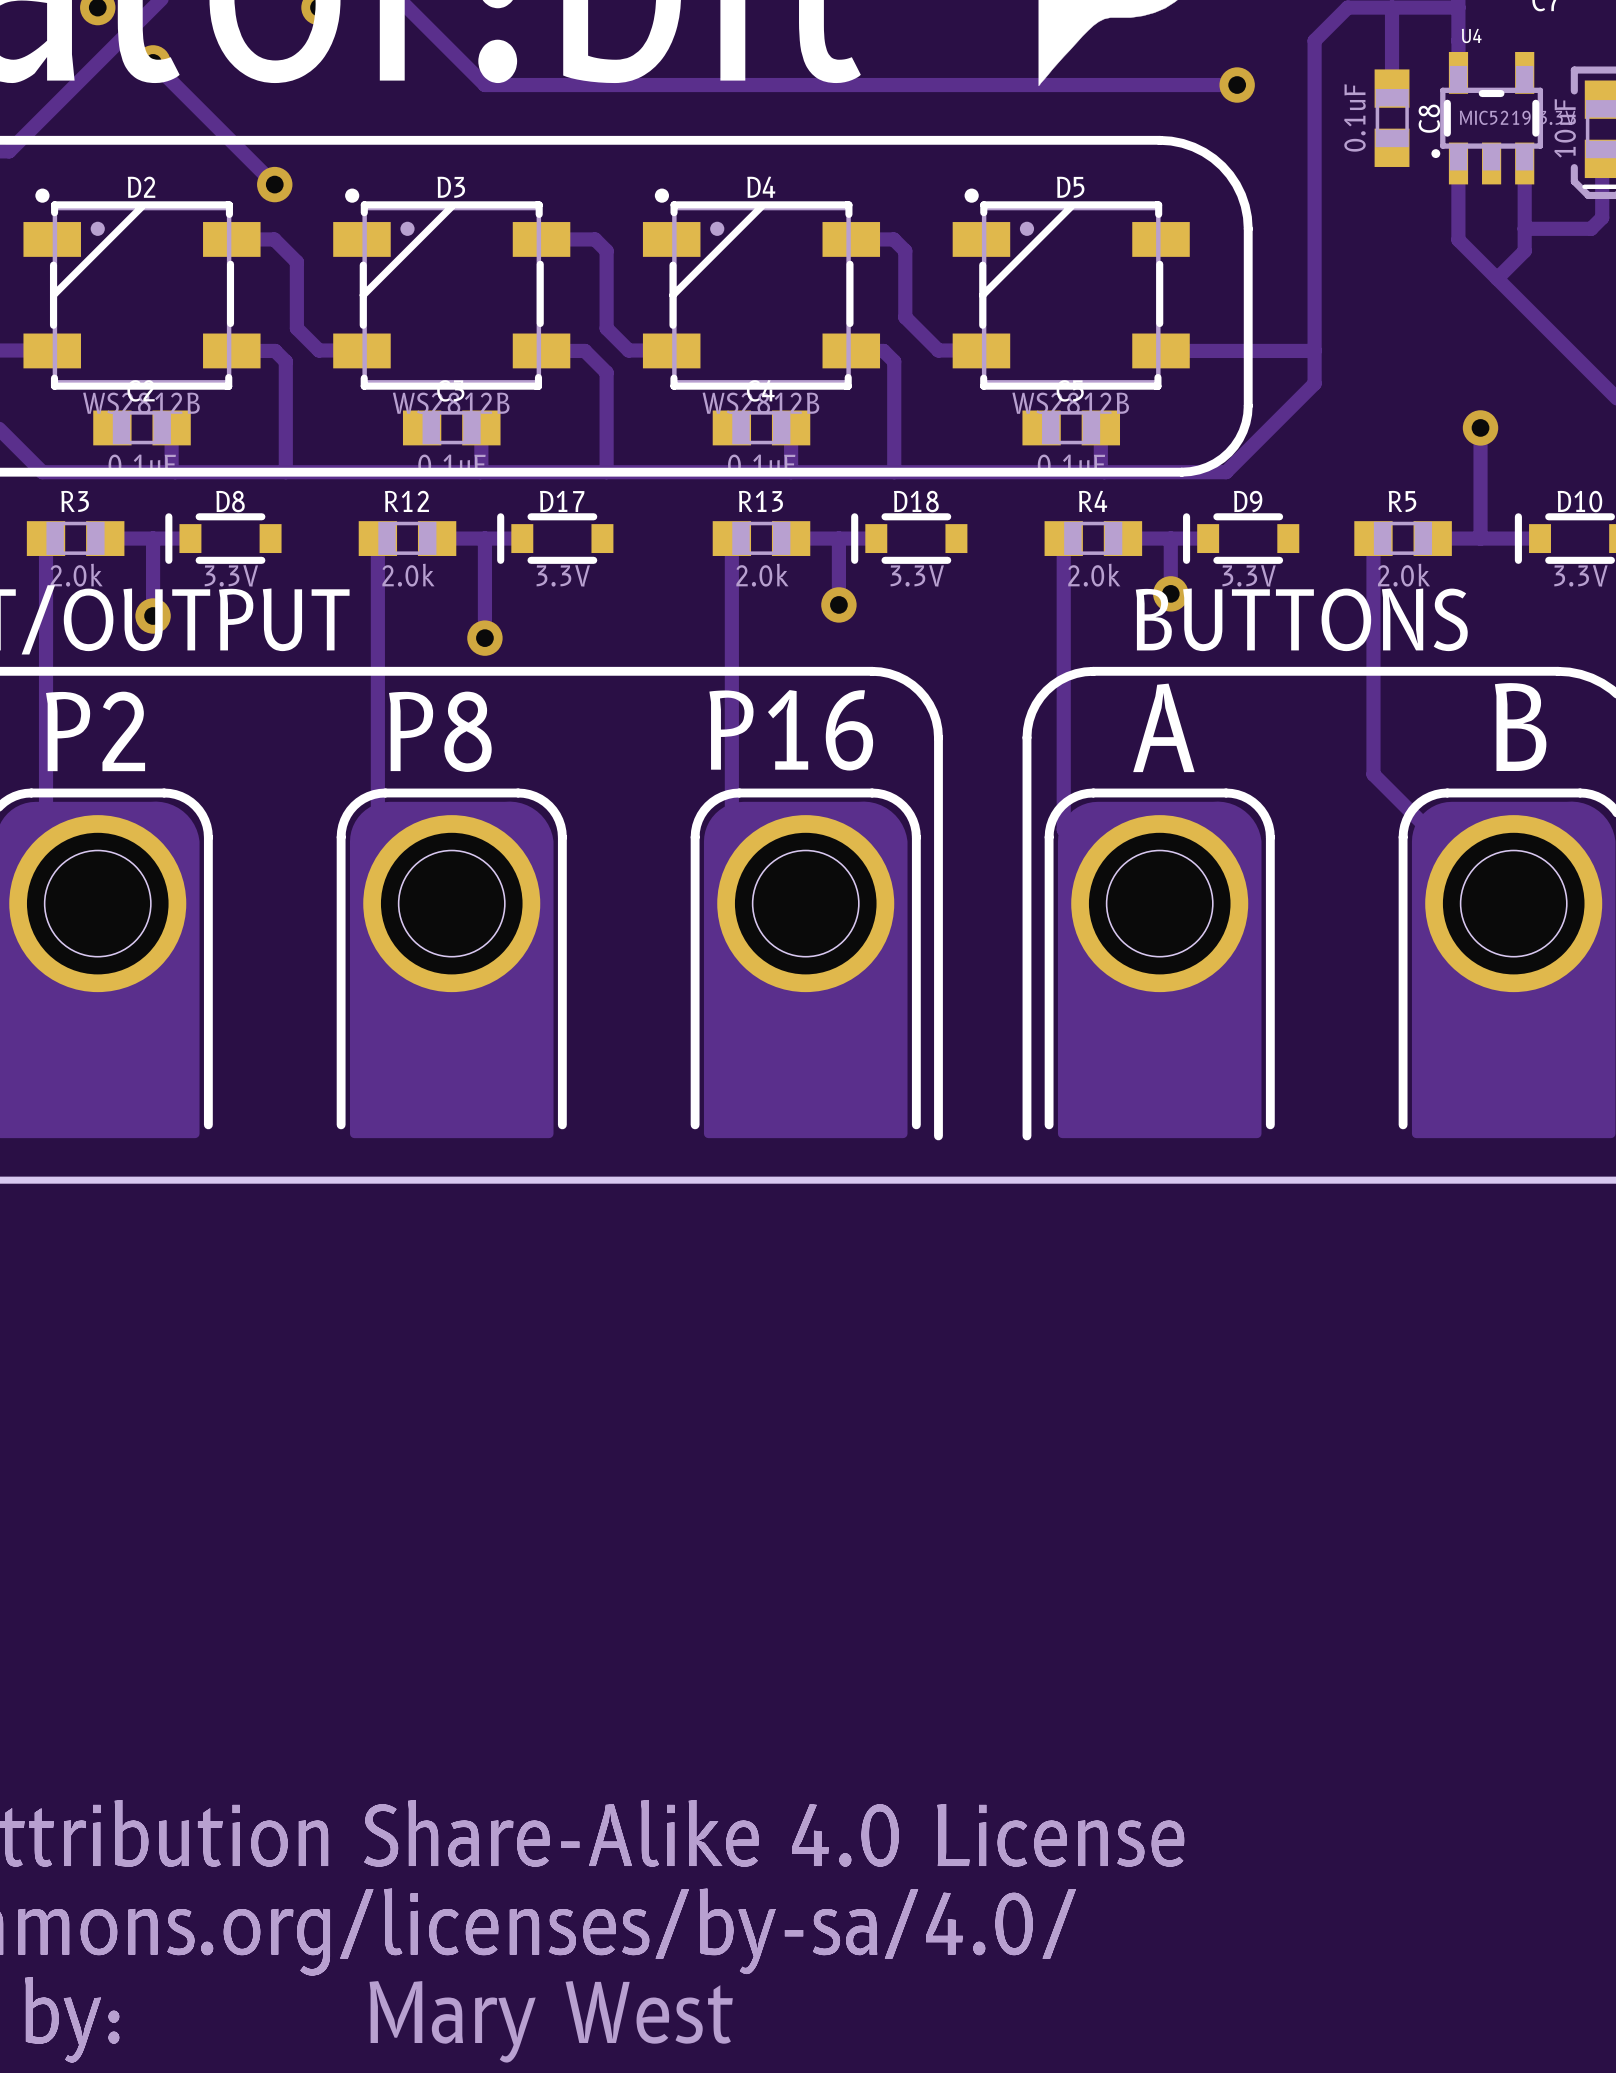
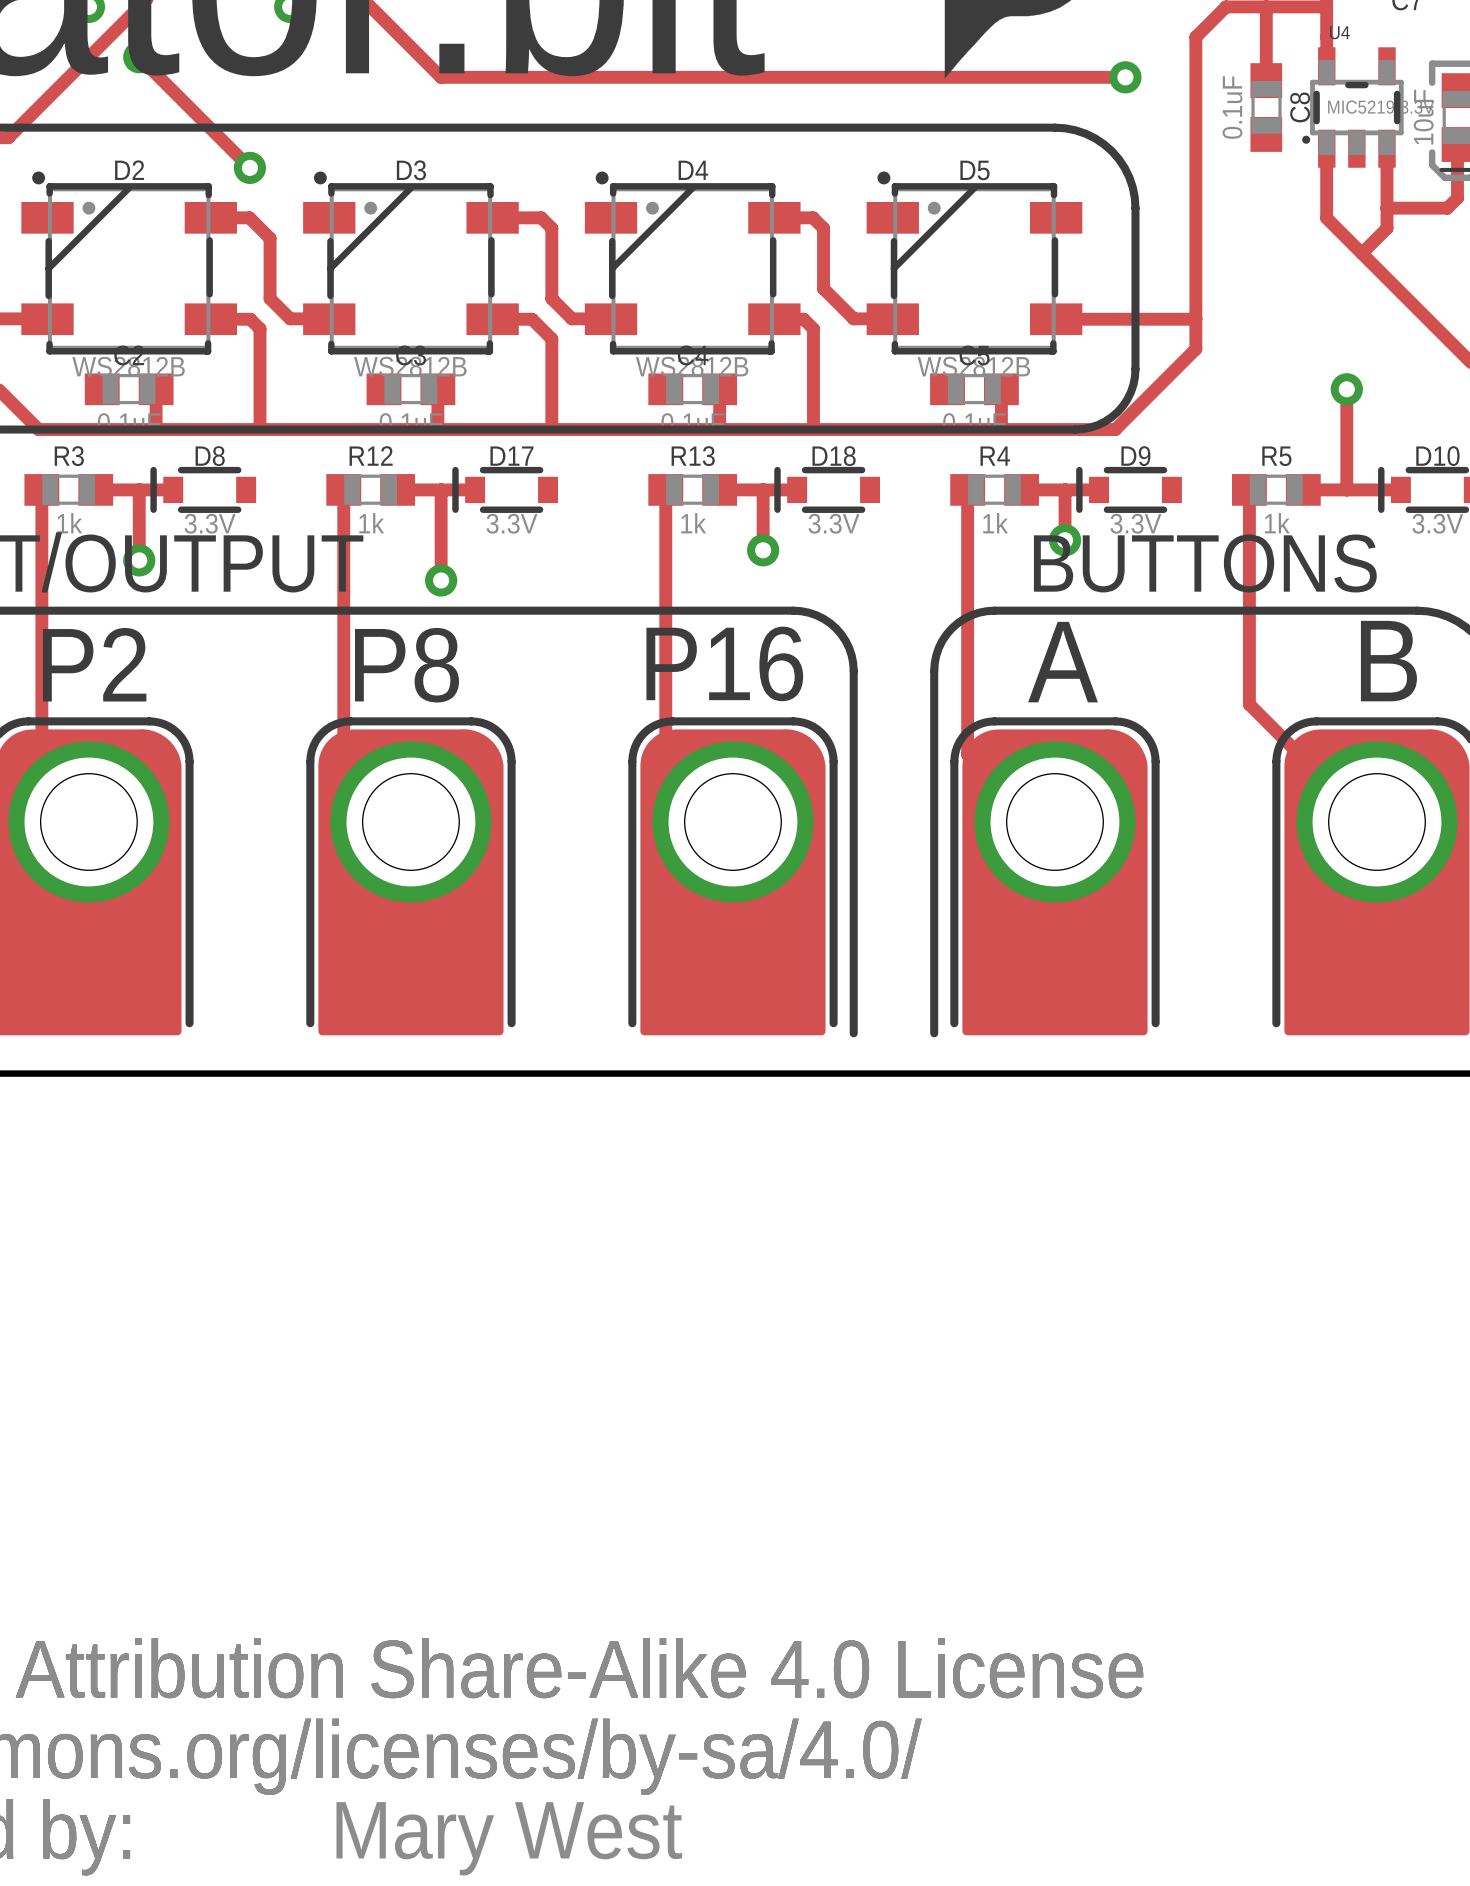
R3 value: 2.0k (76, 575) -> 1k (69, 523)
R12 value: 2.0k (408, 575) -> 1k (371, 523)
R13 value: 2.0k (762, 575) -> 1k (693, 523)
R4 value: 2.0k (1094, 575) -> 1k (995, 523)
R5 value: 2.0k (1404, 575) -> 1k (1277, 523)

